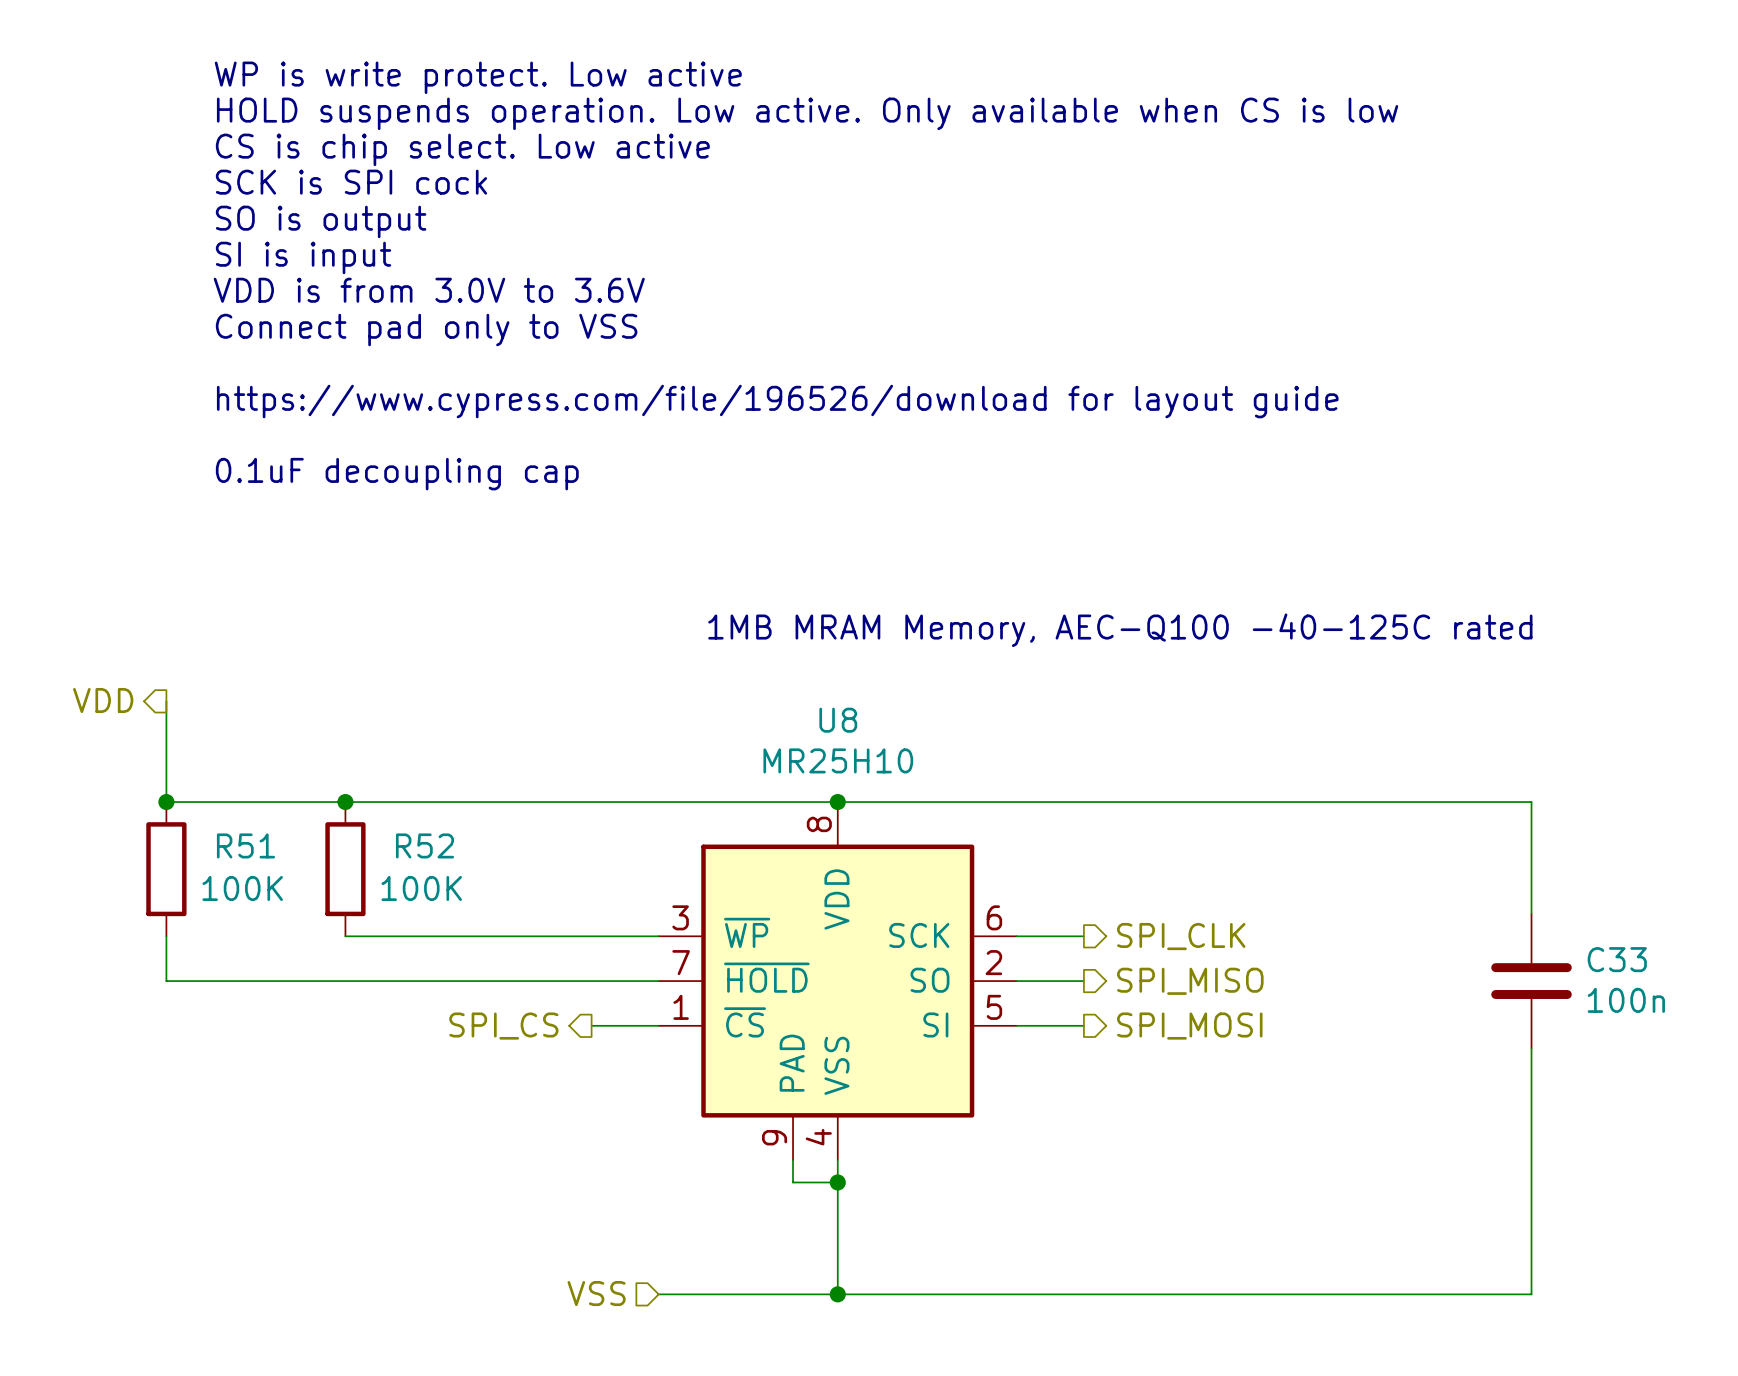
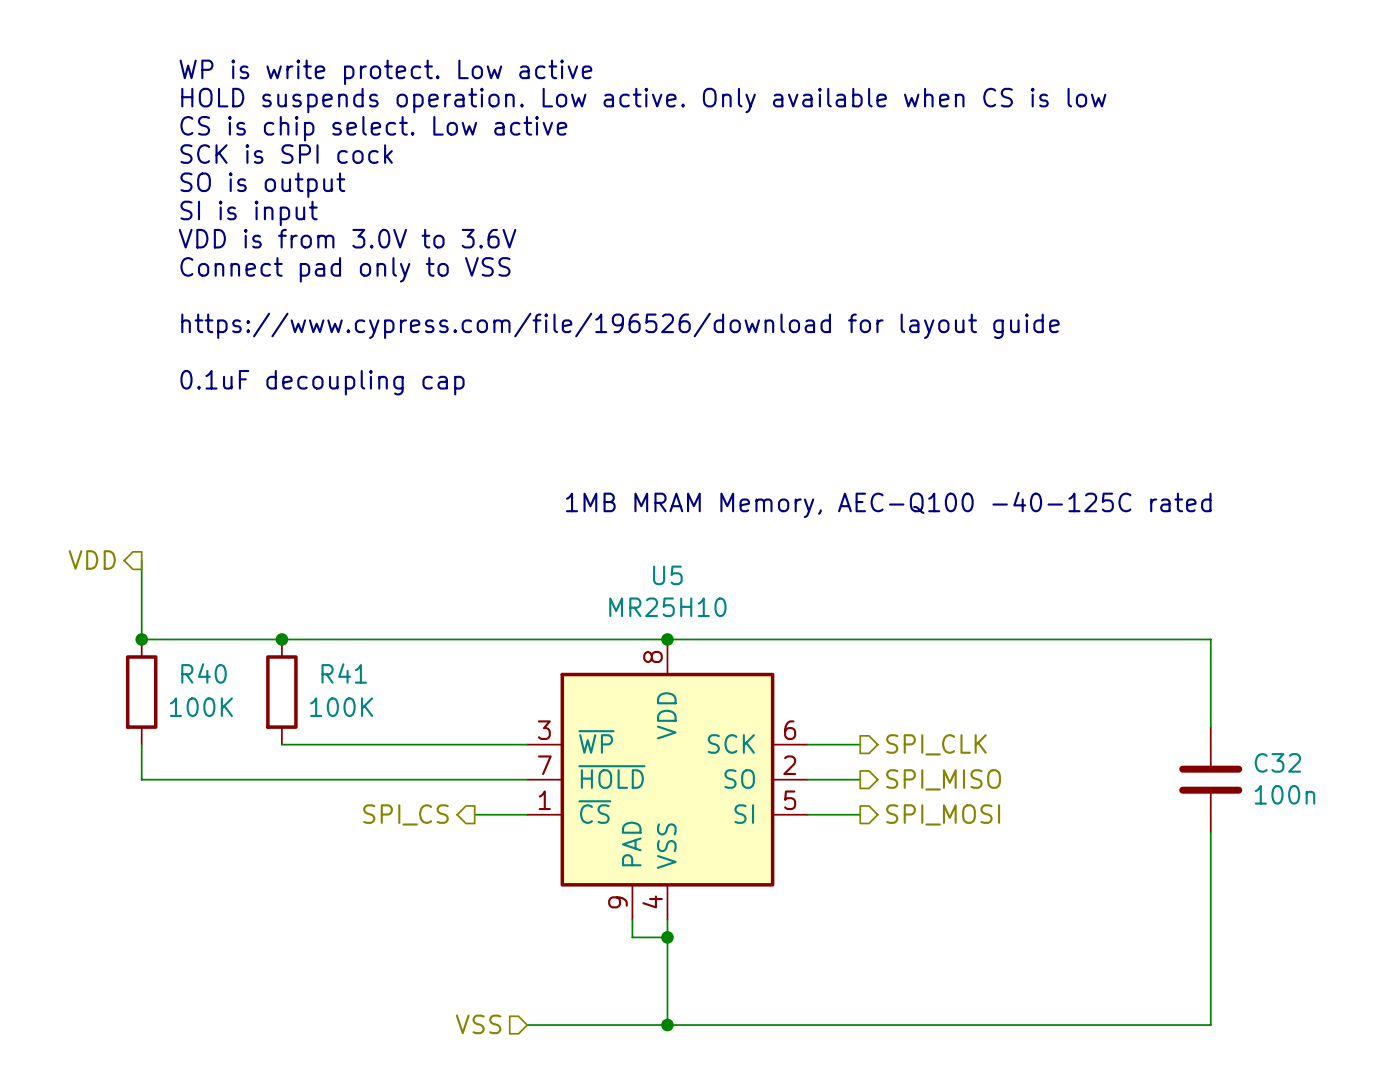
U8 name: U8 (838, 720) -> U5 (667, 575)
R51 name: R51 (245, 845) -> R40 (204, 673)
R52 name: R52 (425, 845) -> R41 (344, 673)
C33 name: C33 (1617, 959) -> C32 (1277, 762)

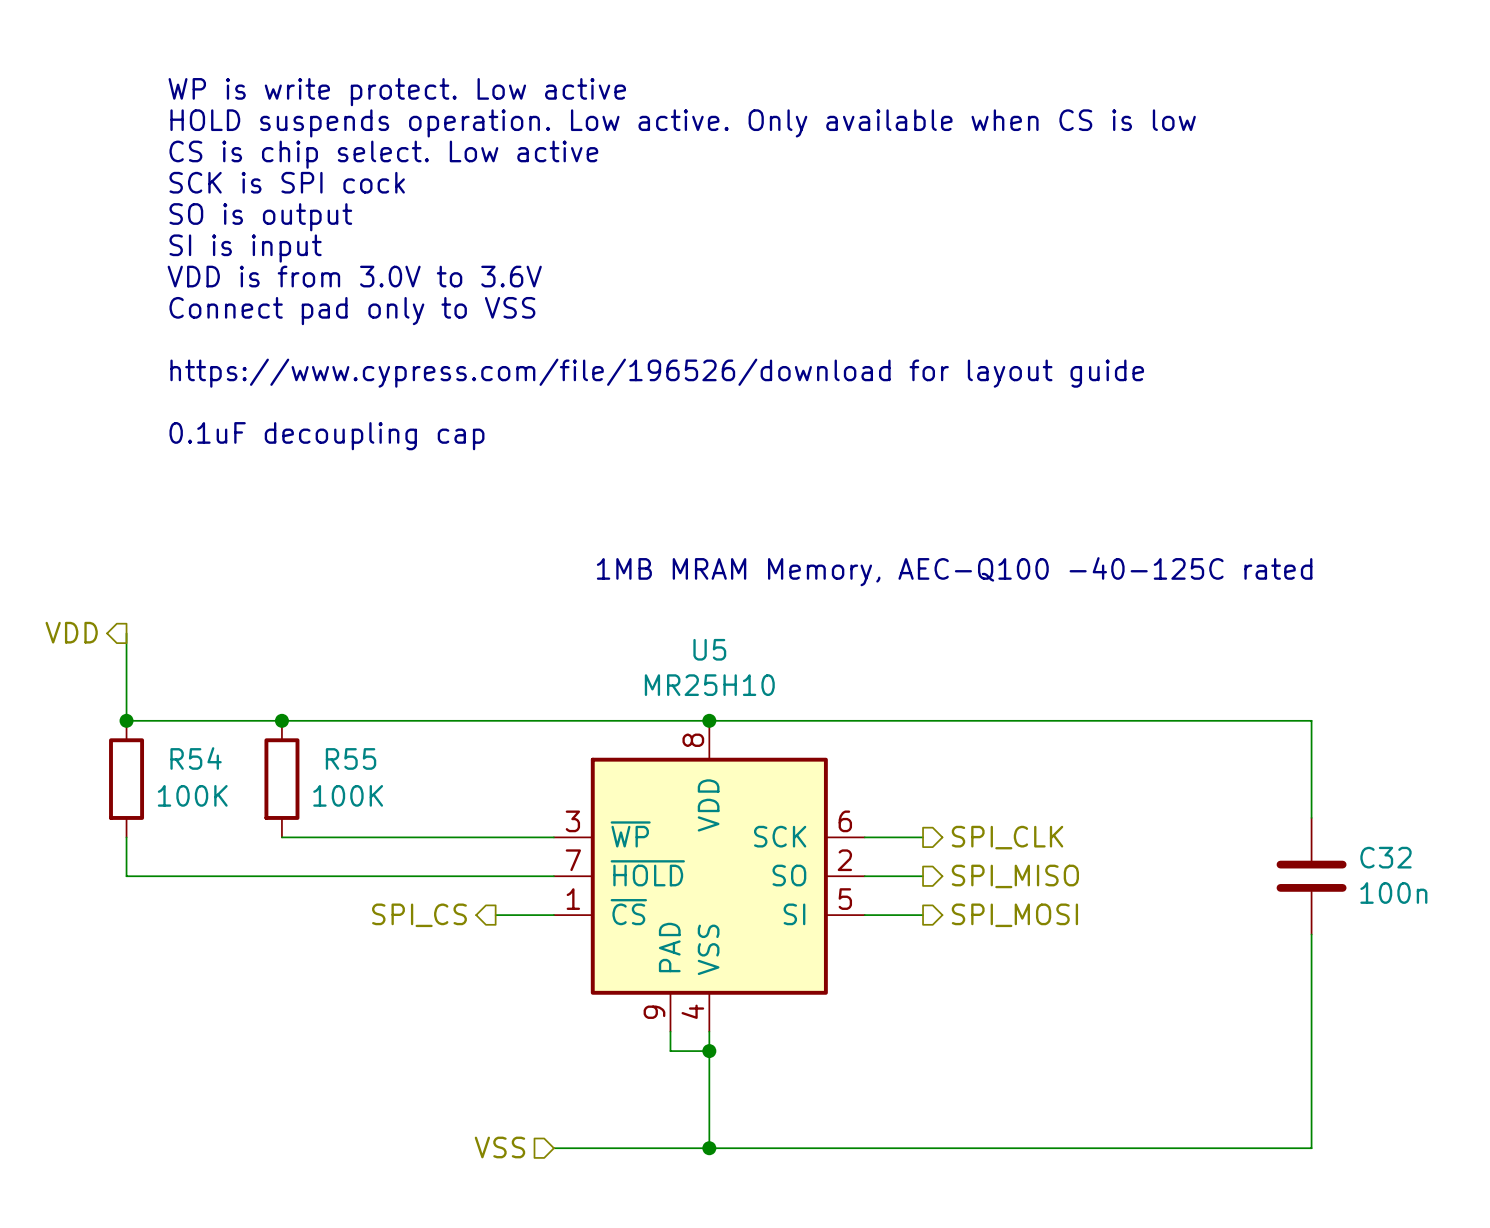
R40 name: R40 (204, 673) -> R54 (196, 758)
R41 name: R41 (344, 673) -> R55 (351, 758)

